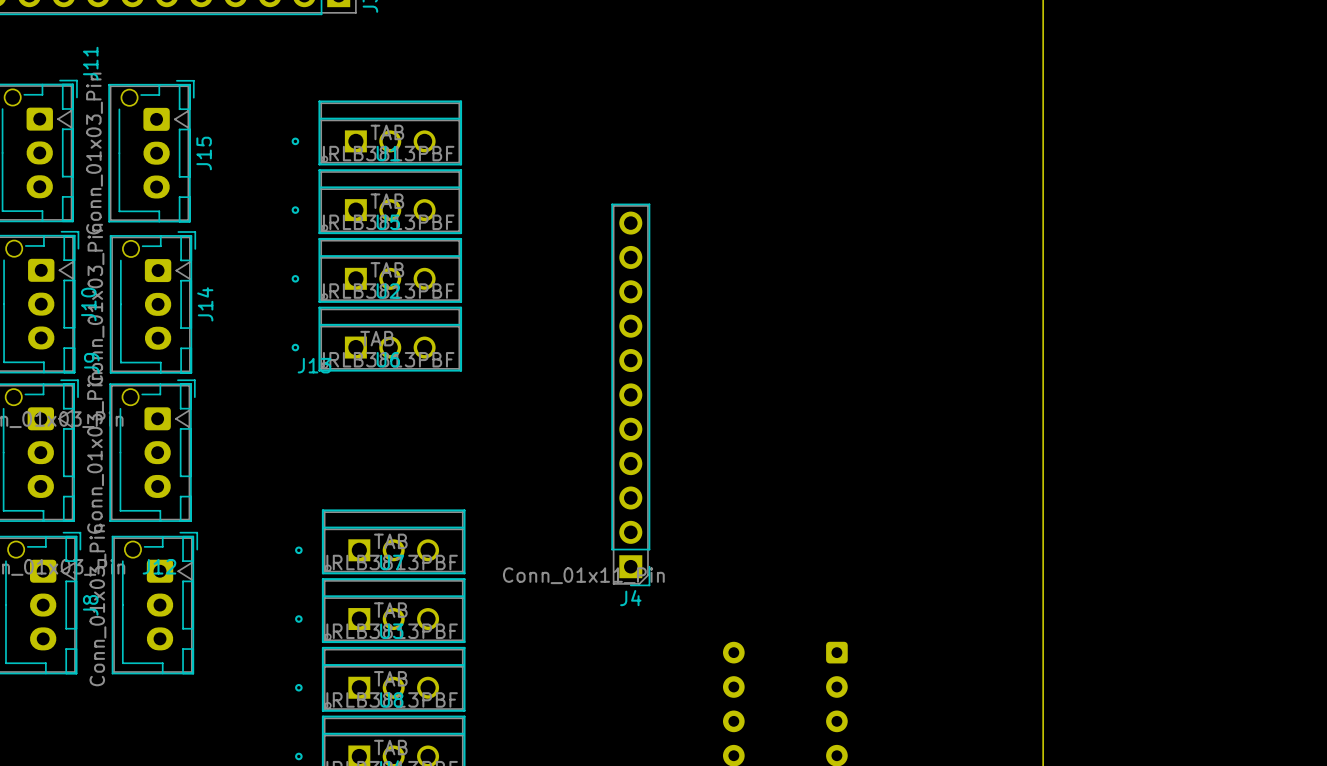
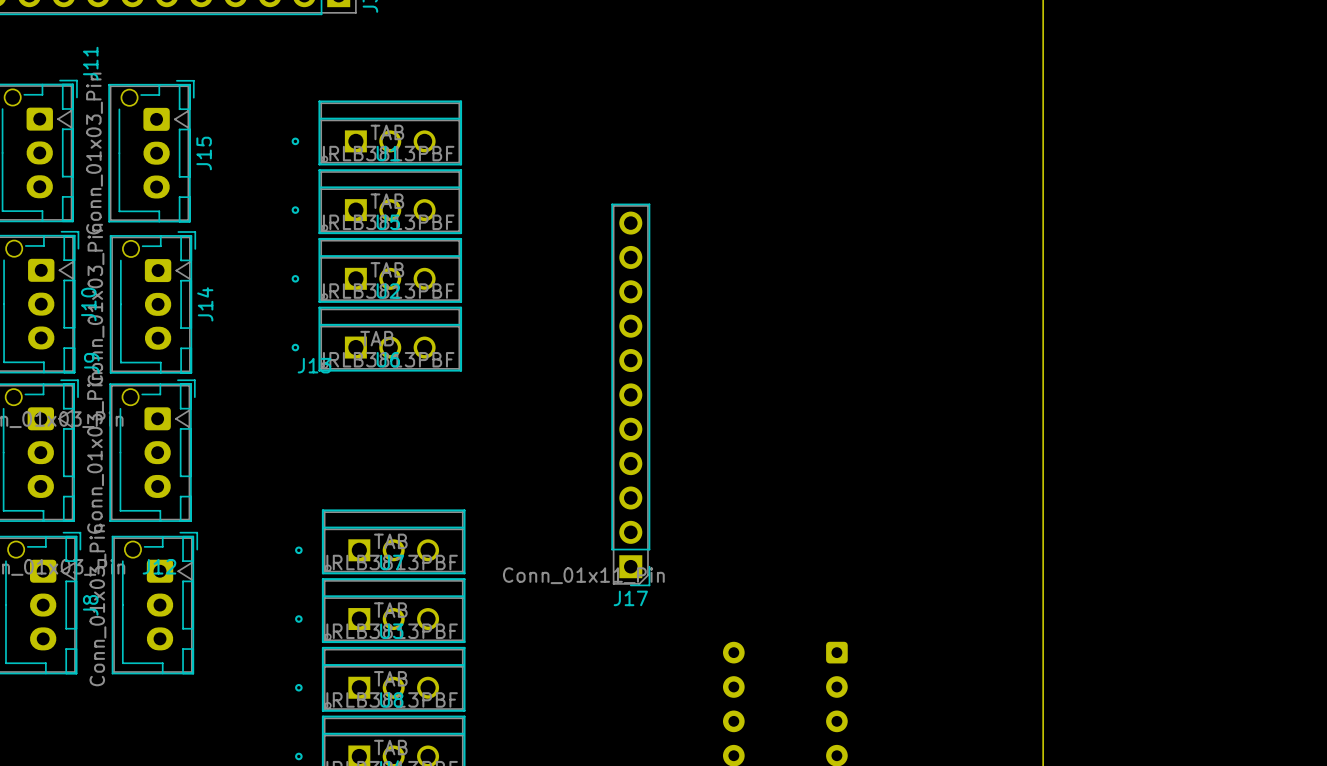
J4 name: J4 (630, 598) -> J17 (630, 598)

